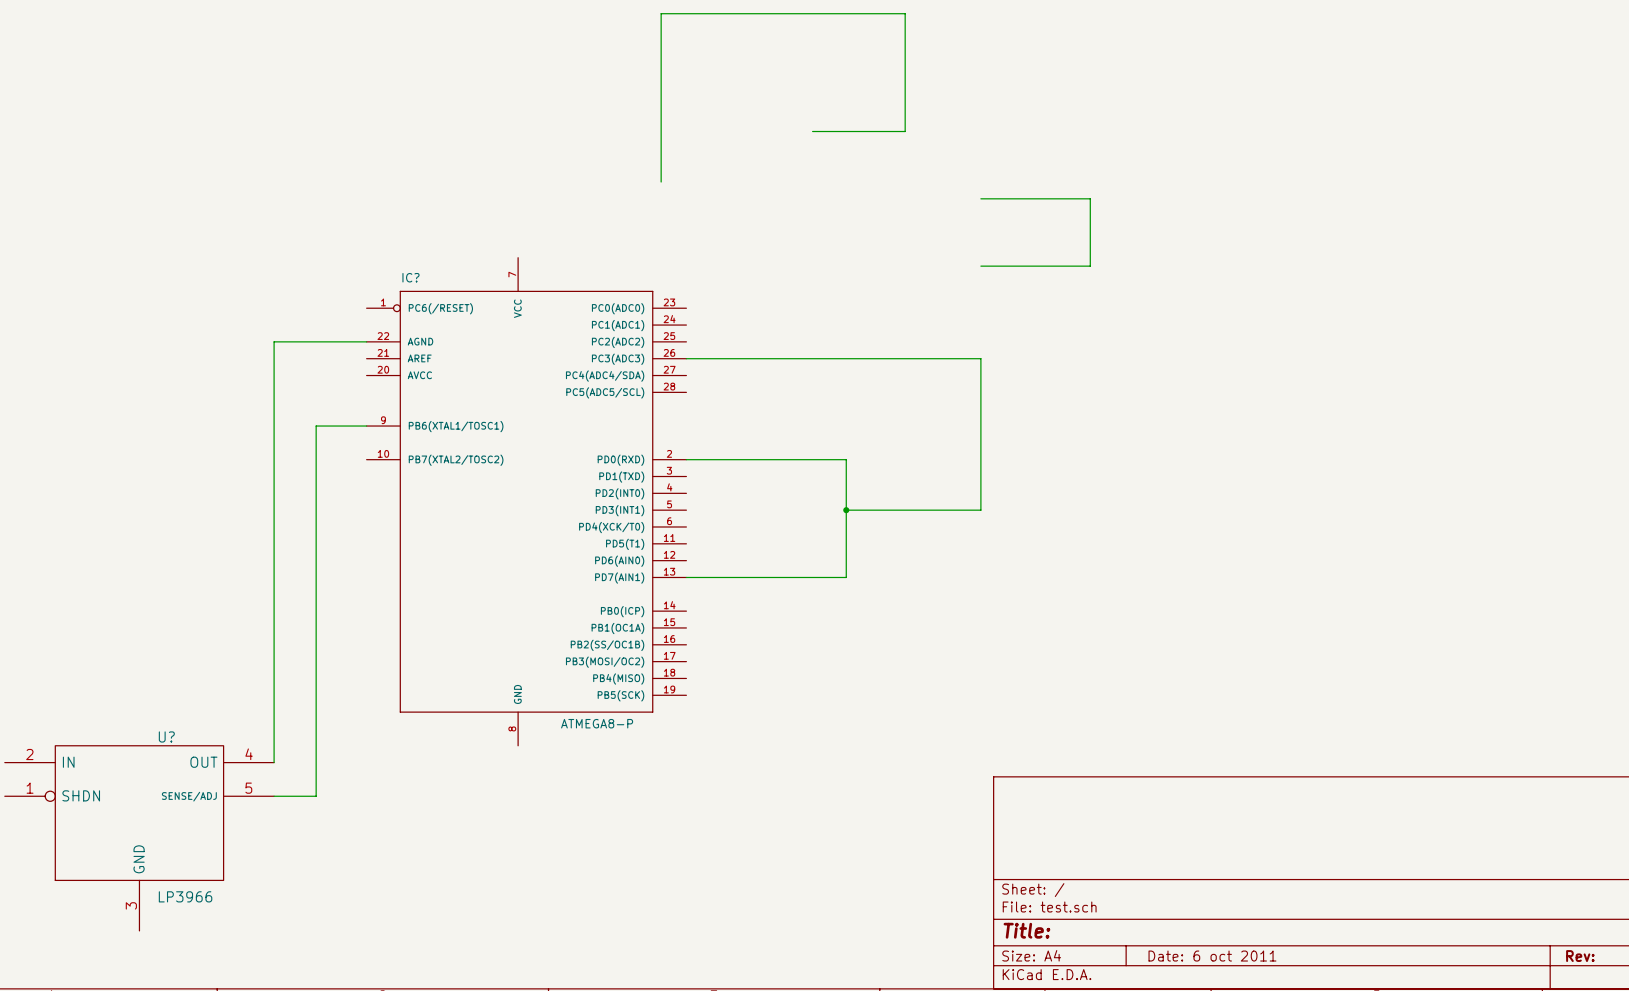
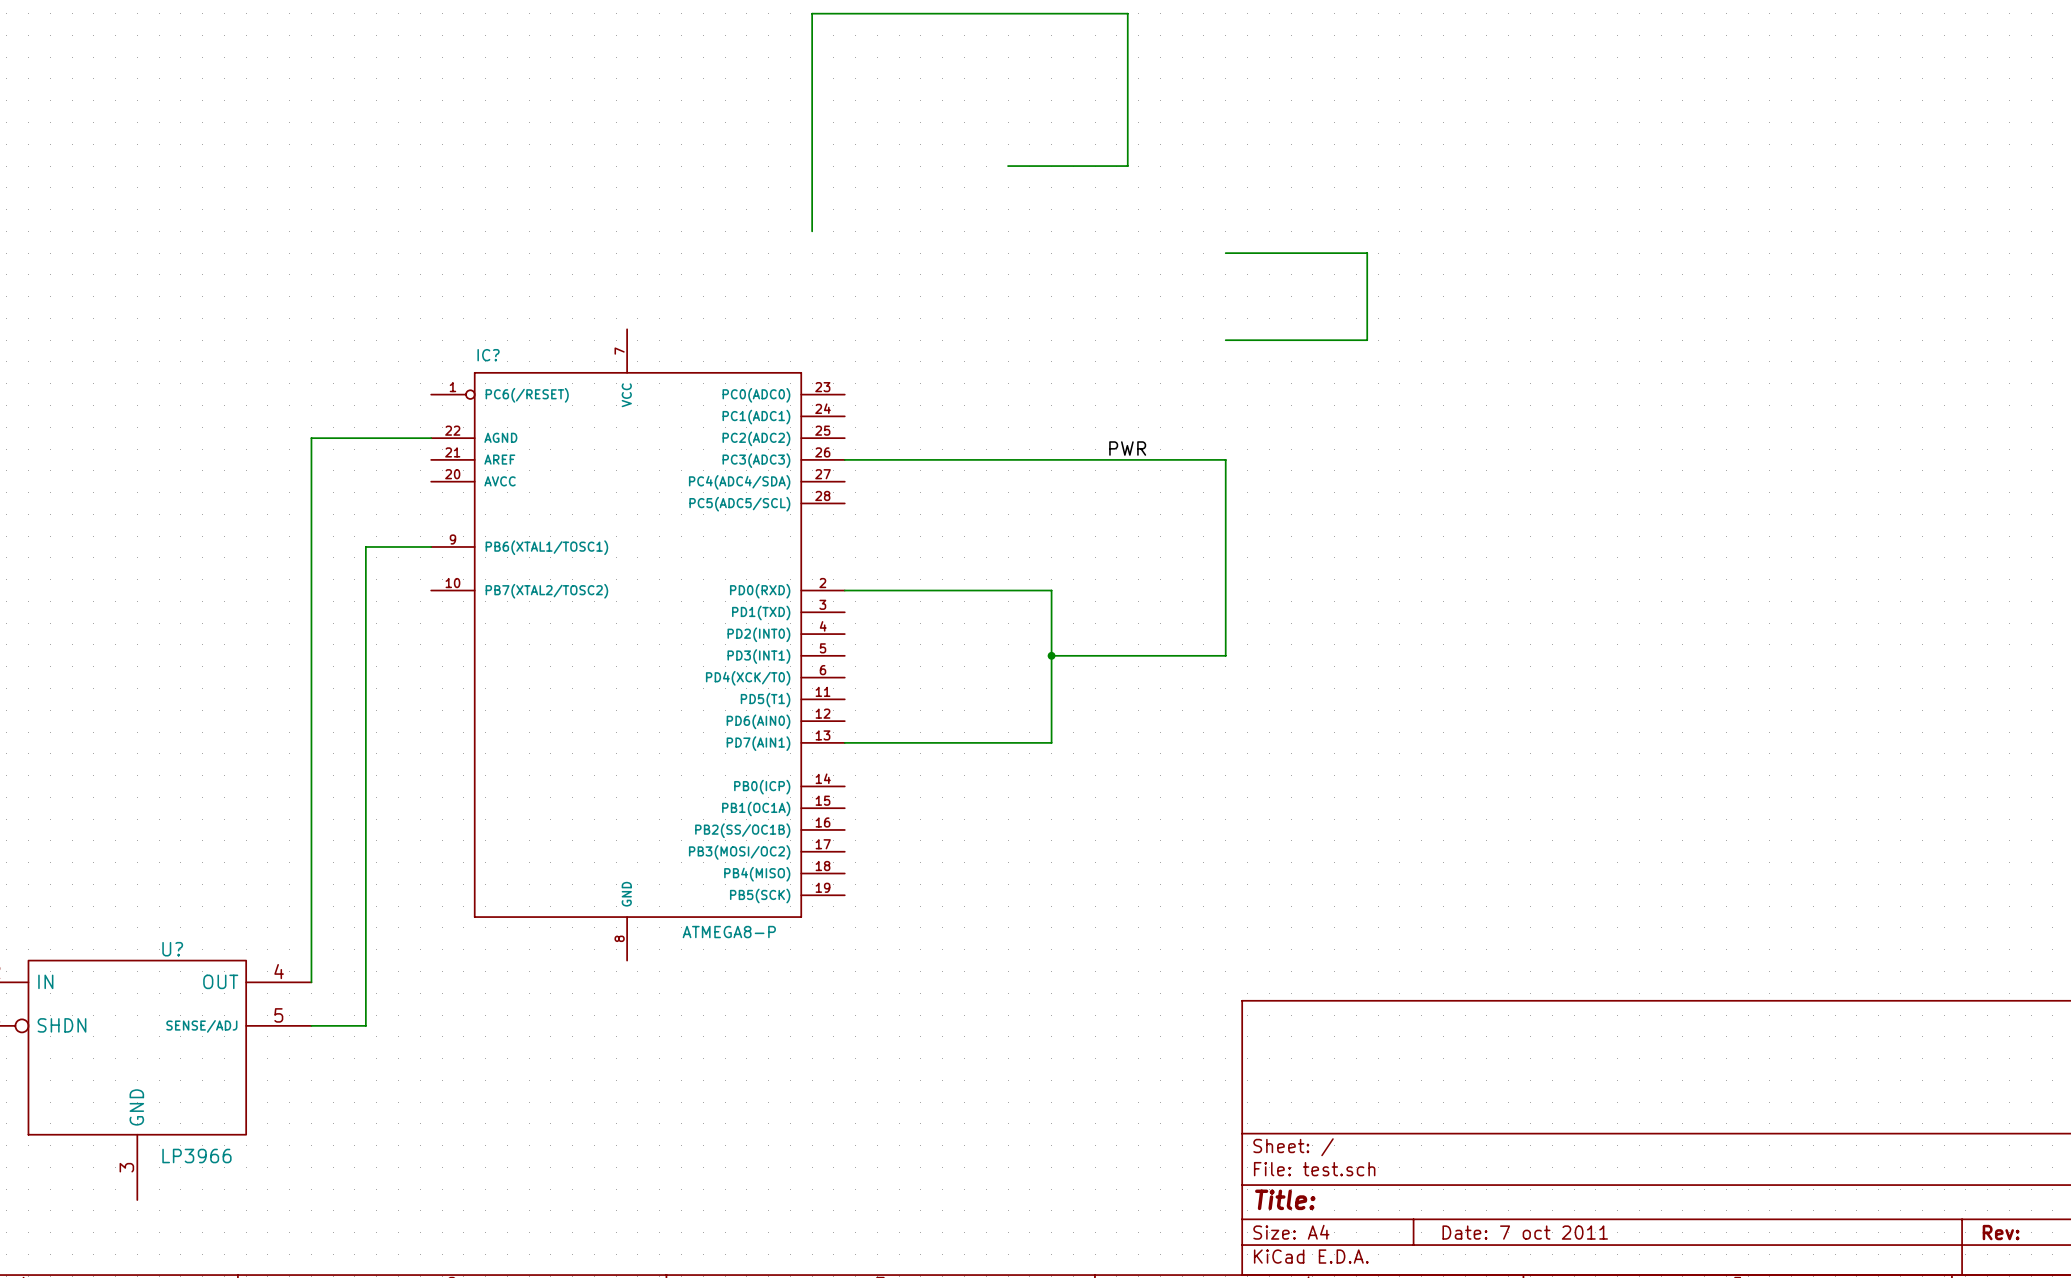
label: none -> PWR (1127, 448)
title block: Date: 6 oct 2011 (1212, 956) -> Date: 7 oct 2011 (1525, 1232)

